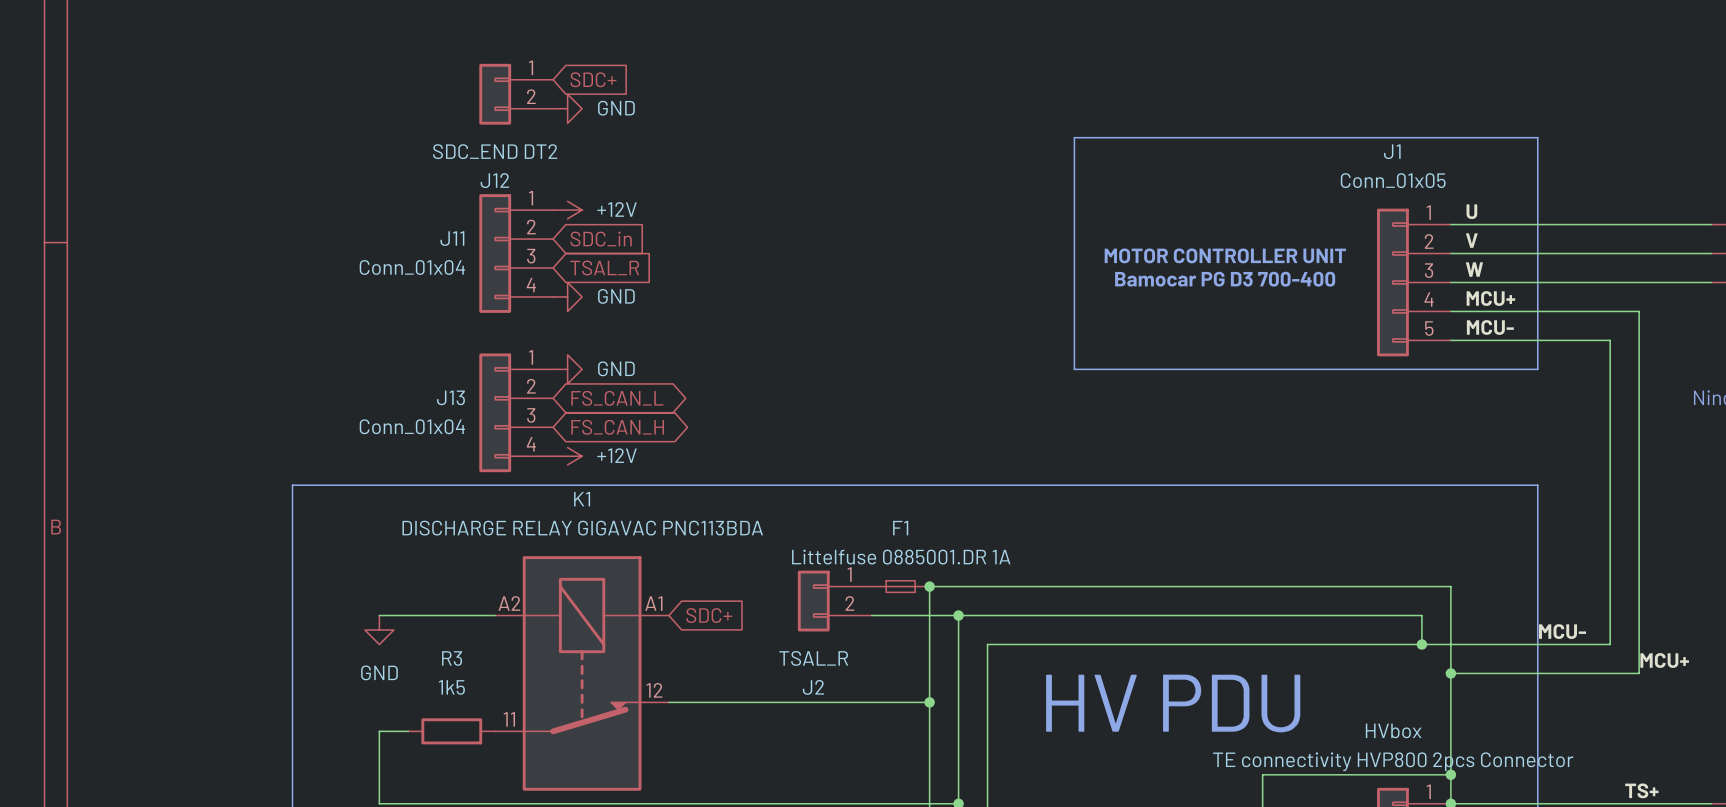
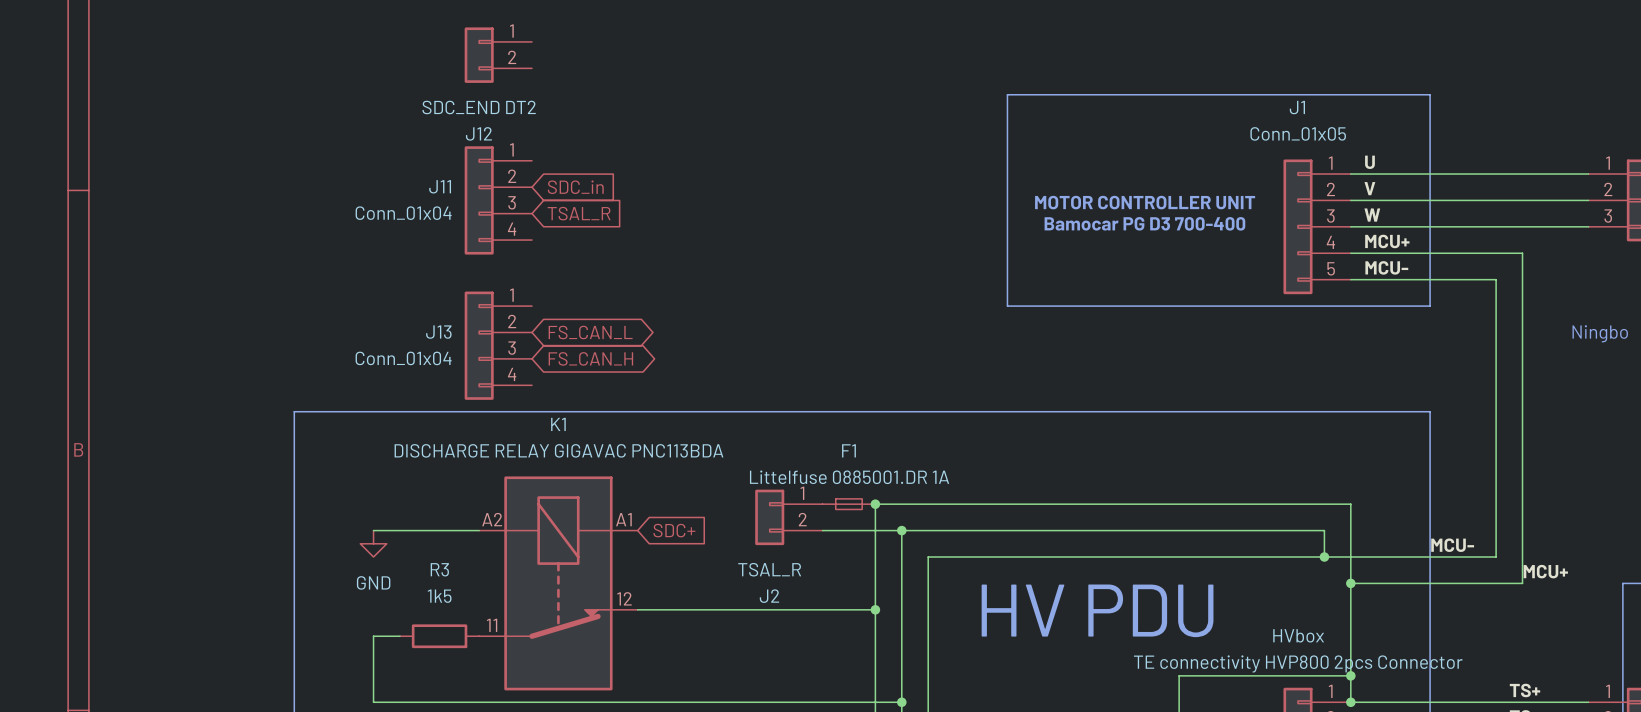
global label: SDC+ (593, 79) -> none
power symbol: GND (567, 108) -> none
power symbol: +12V (567, 210) -> none
power symbol: GND (567, 296) -> none
power symbol: GND (567, 369) -> none
power symbol: +12V (567, 456) -> none

